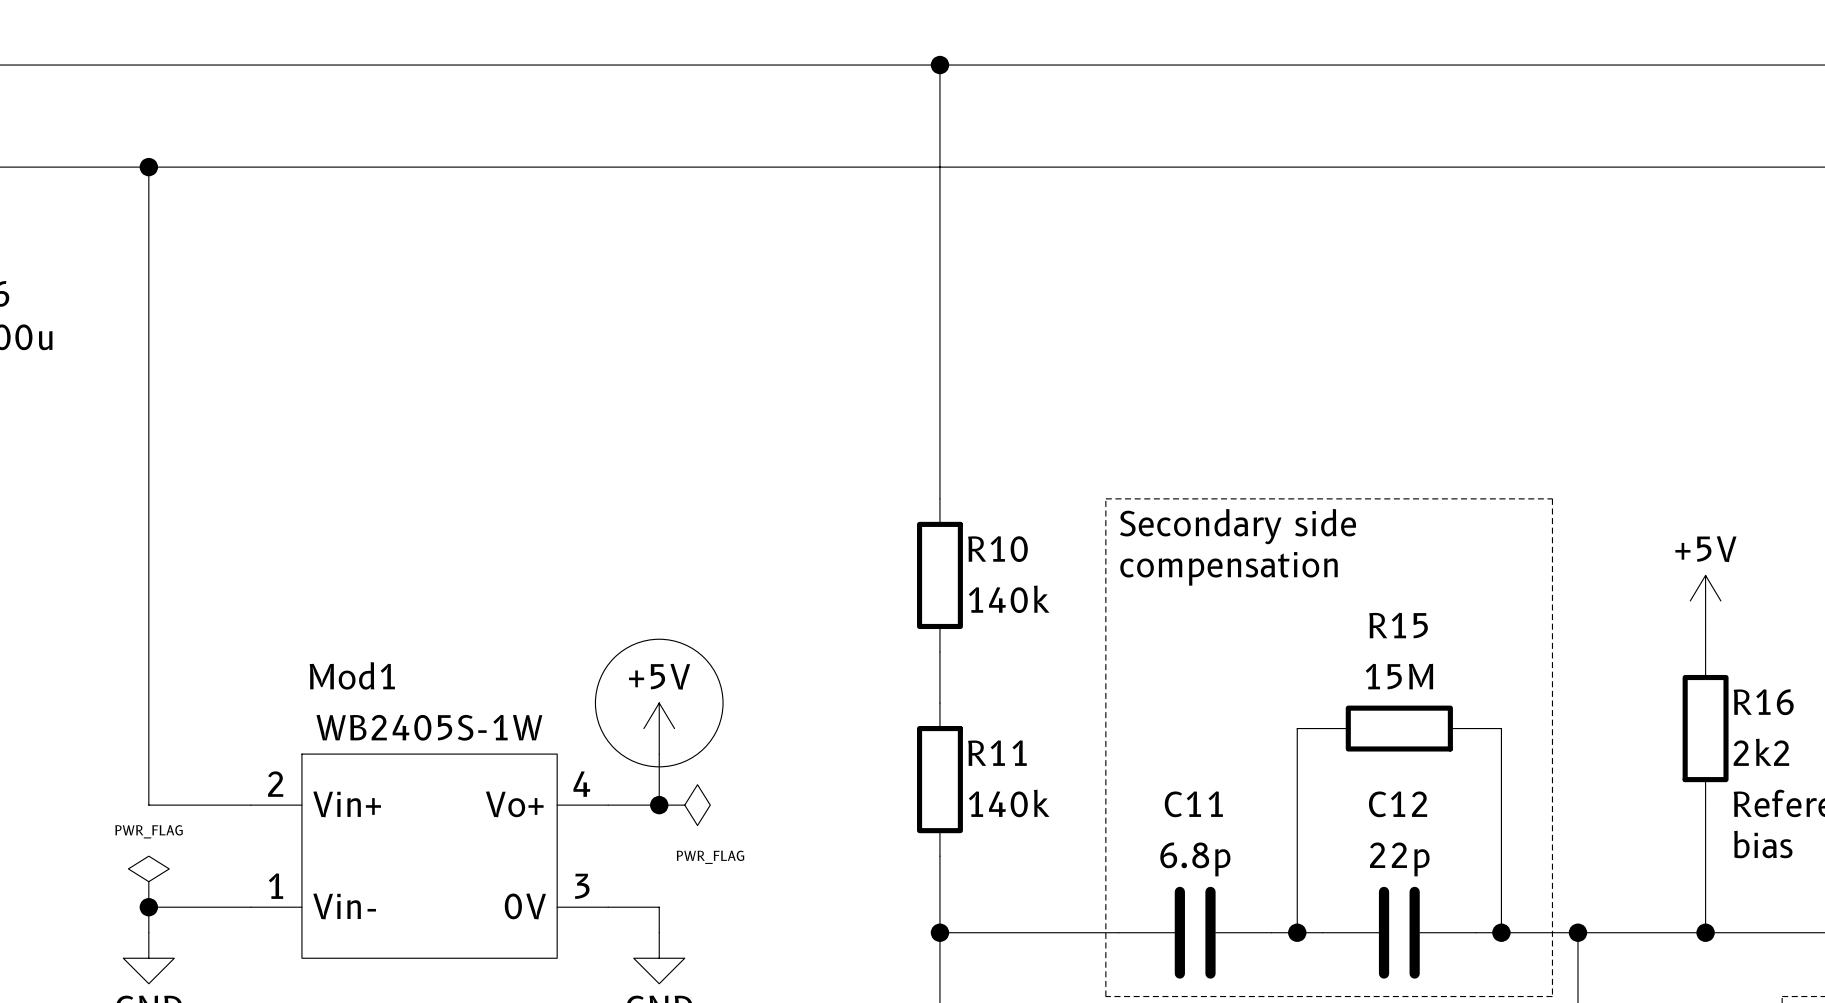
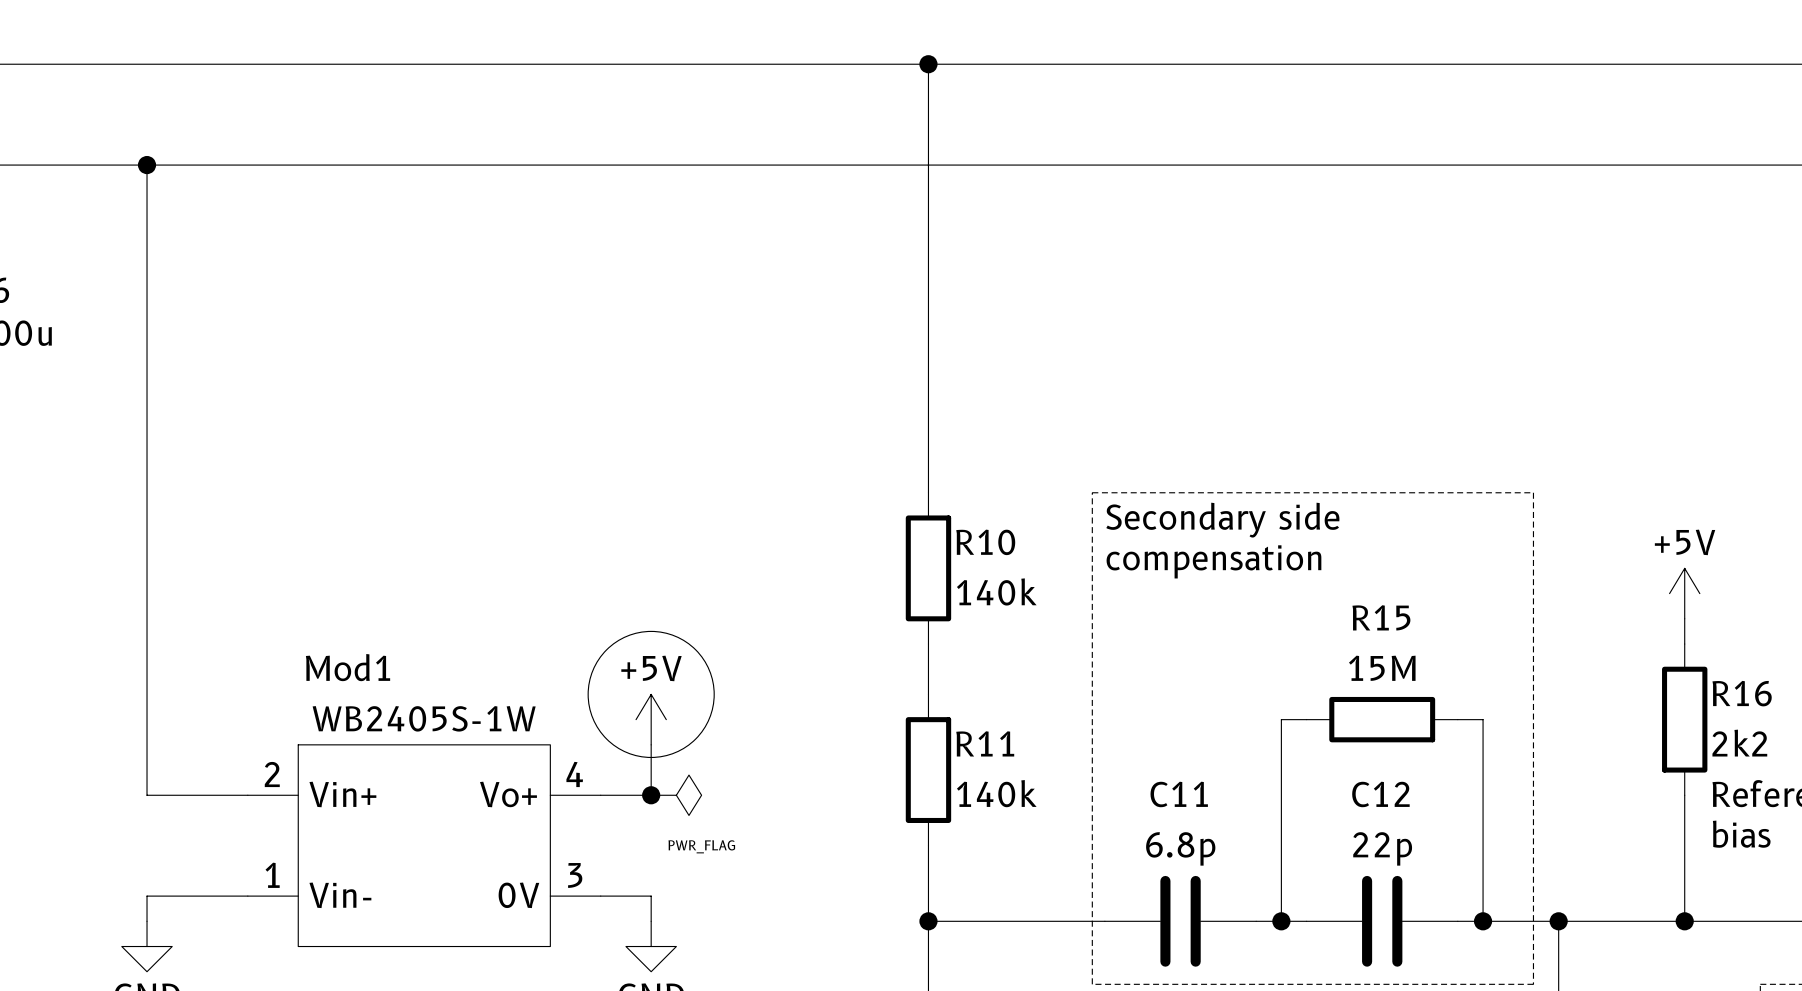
power symbol: PWR_FLAG (148, 881) -> none
junction: (148, 907) -> none

